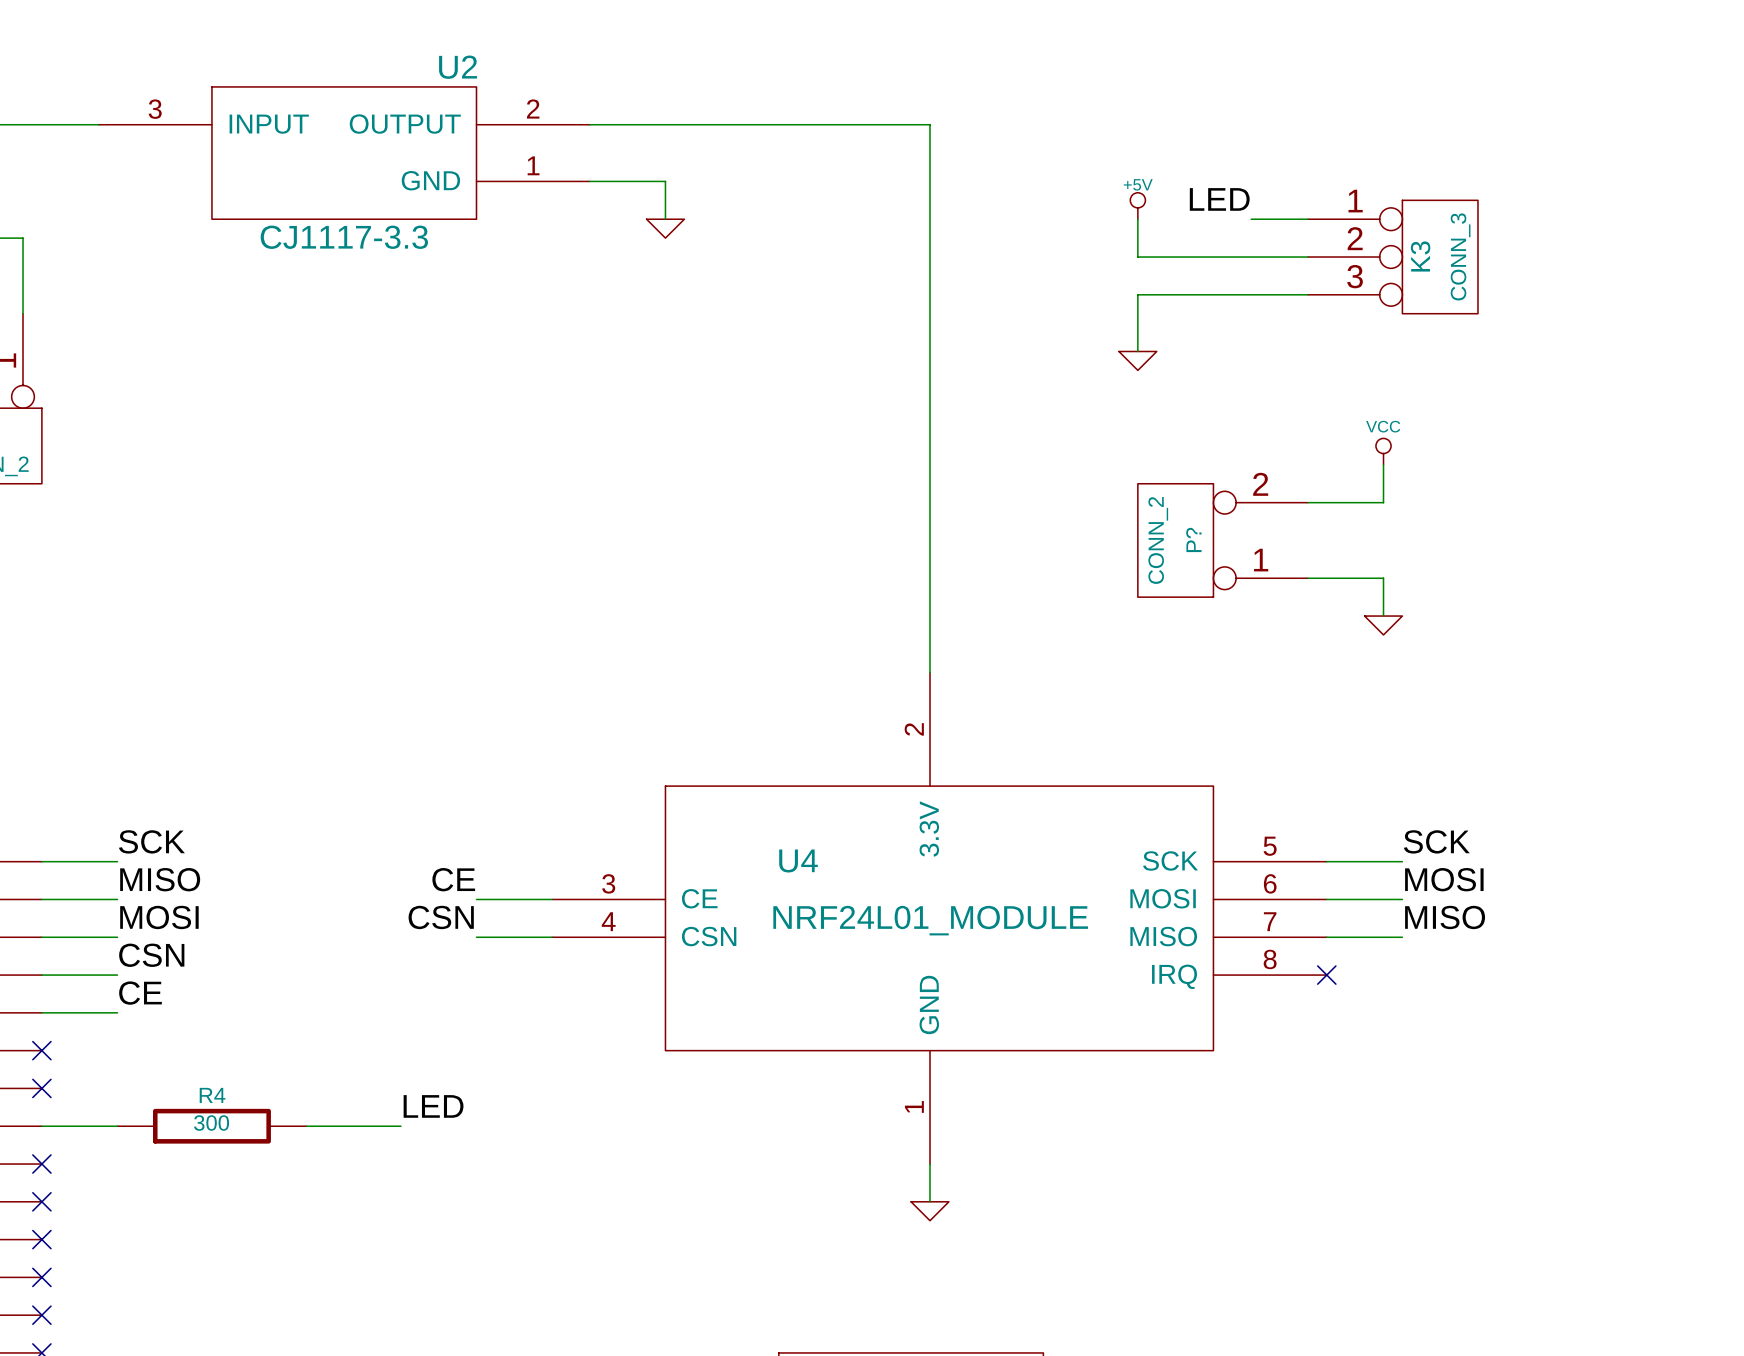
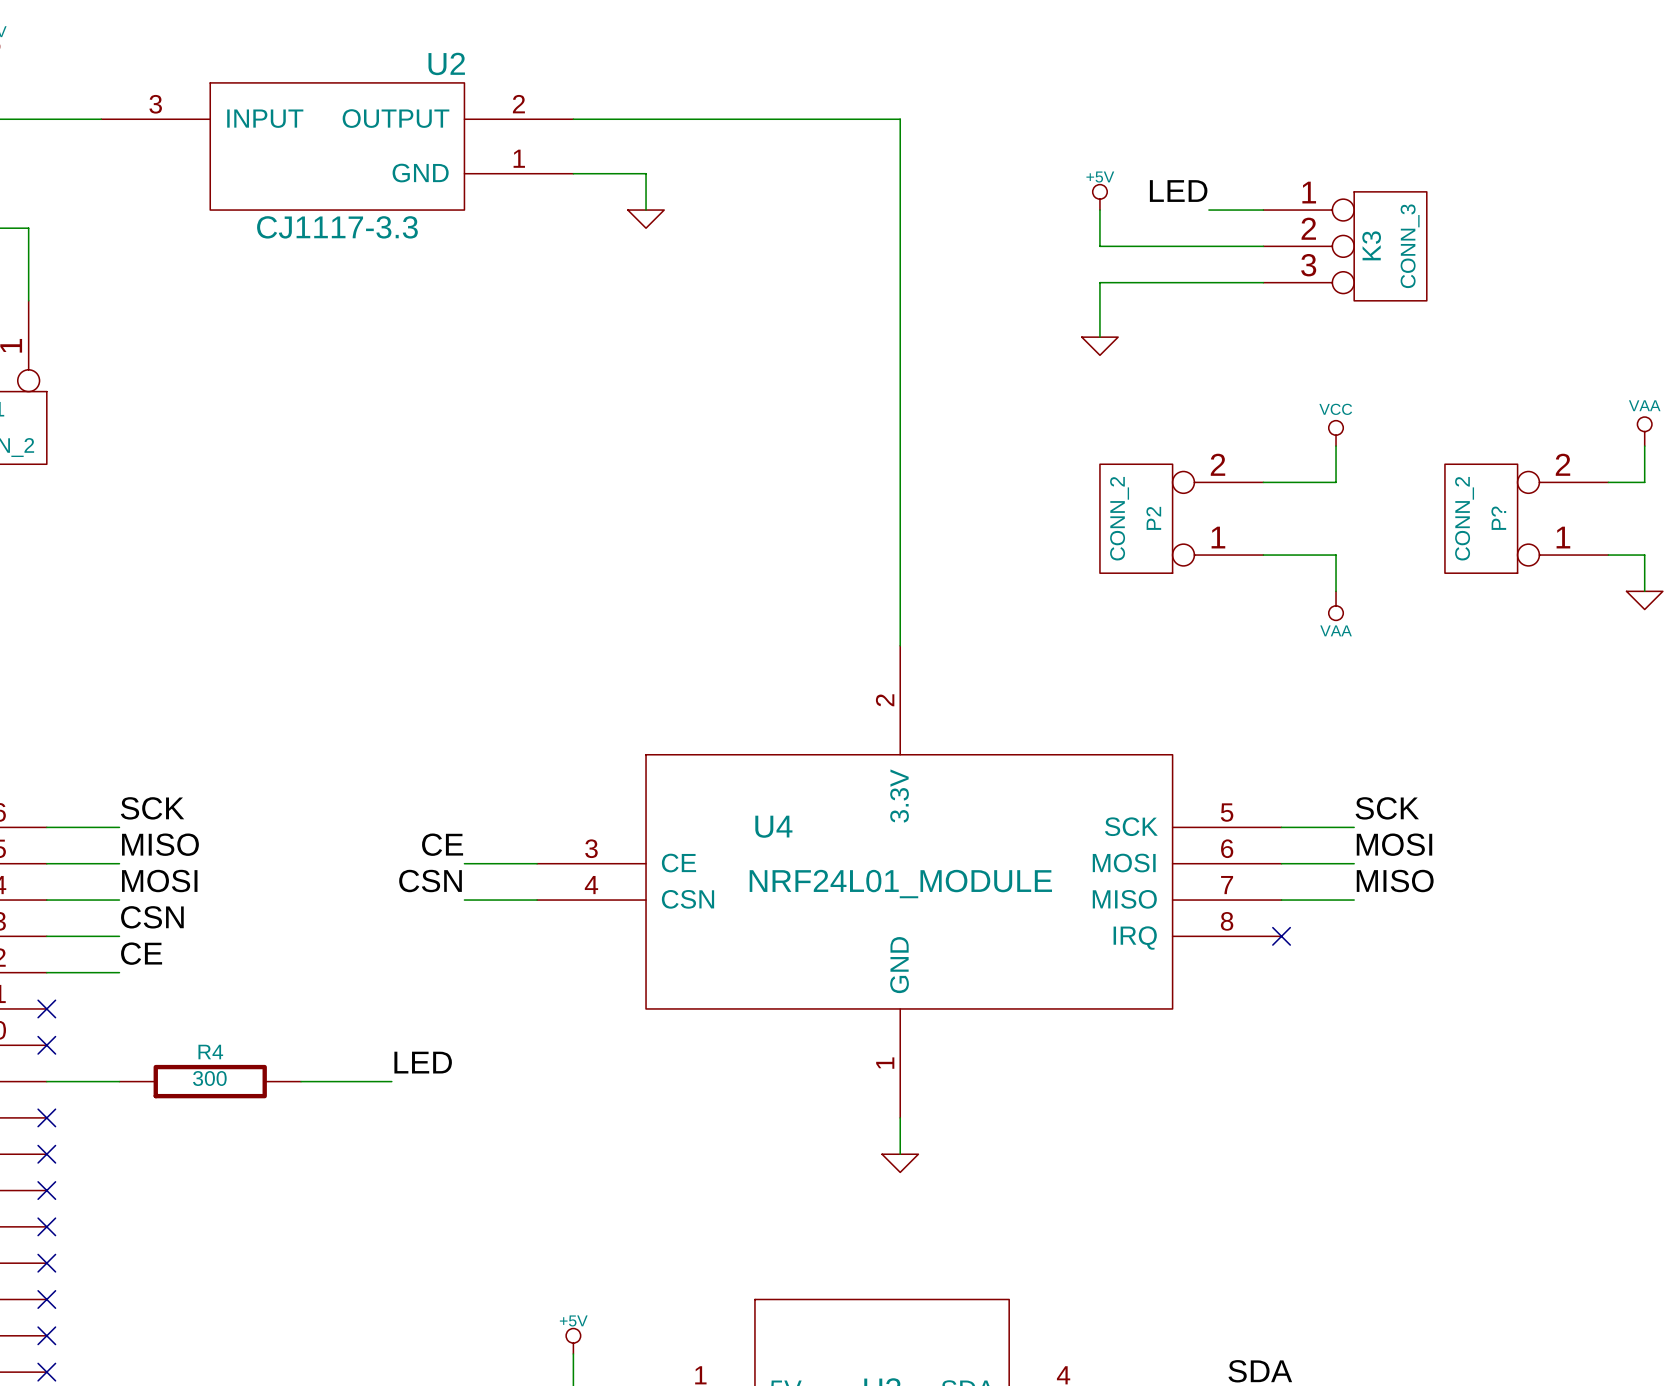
power symbol: none -> VAA (1644, 431)
wire: none -> (1644, 446) (1644, 482) (1608, 482)
P? name: P? (1193, 539) -> P2 (1153, 518)
P?: none -> CONN_2 (1526, 518)
wire: none -> (1608, 555) (1644, 555) (1644, 591)
power symbol shape: [1364, 616, 1403, 635] -> [1328, 591, 1344, 621]
power symbol: none -> (1644, 600)
power symbol text: none -> VAA (1336, 630)

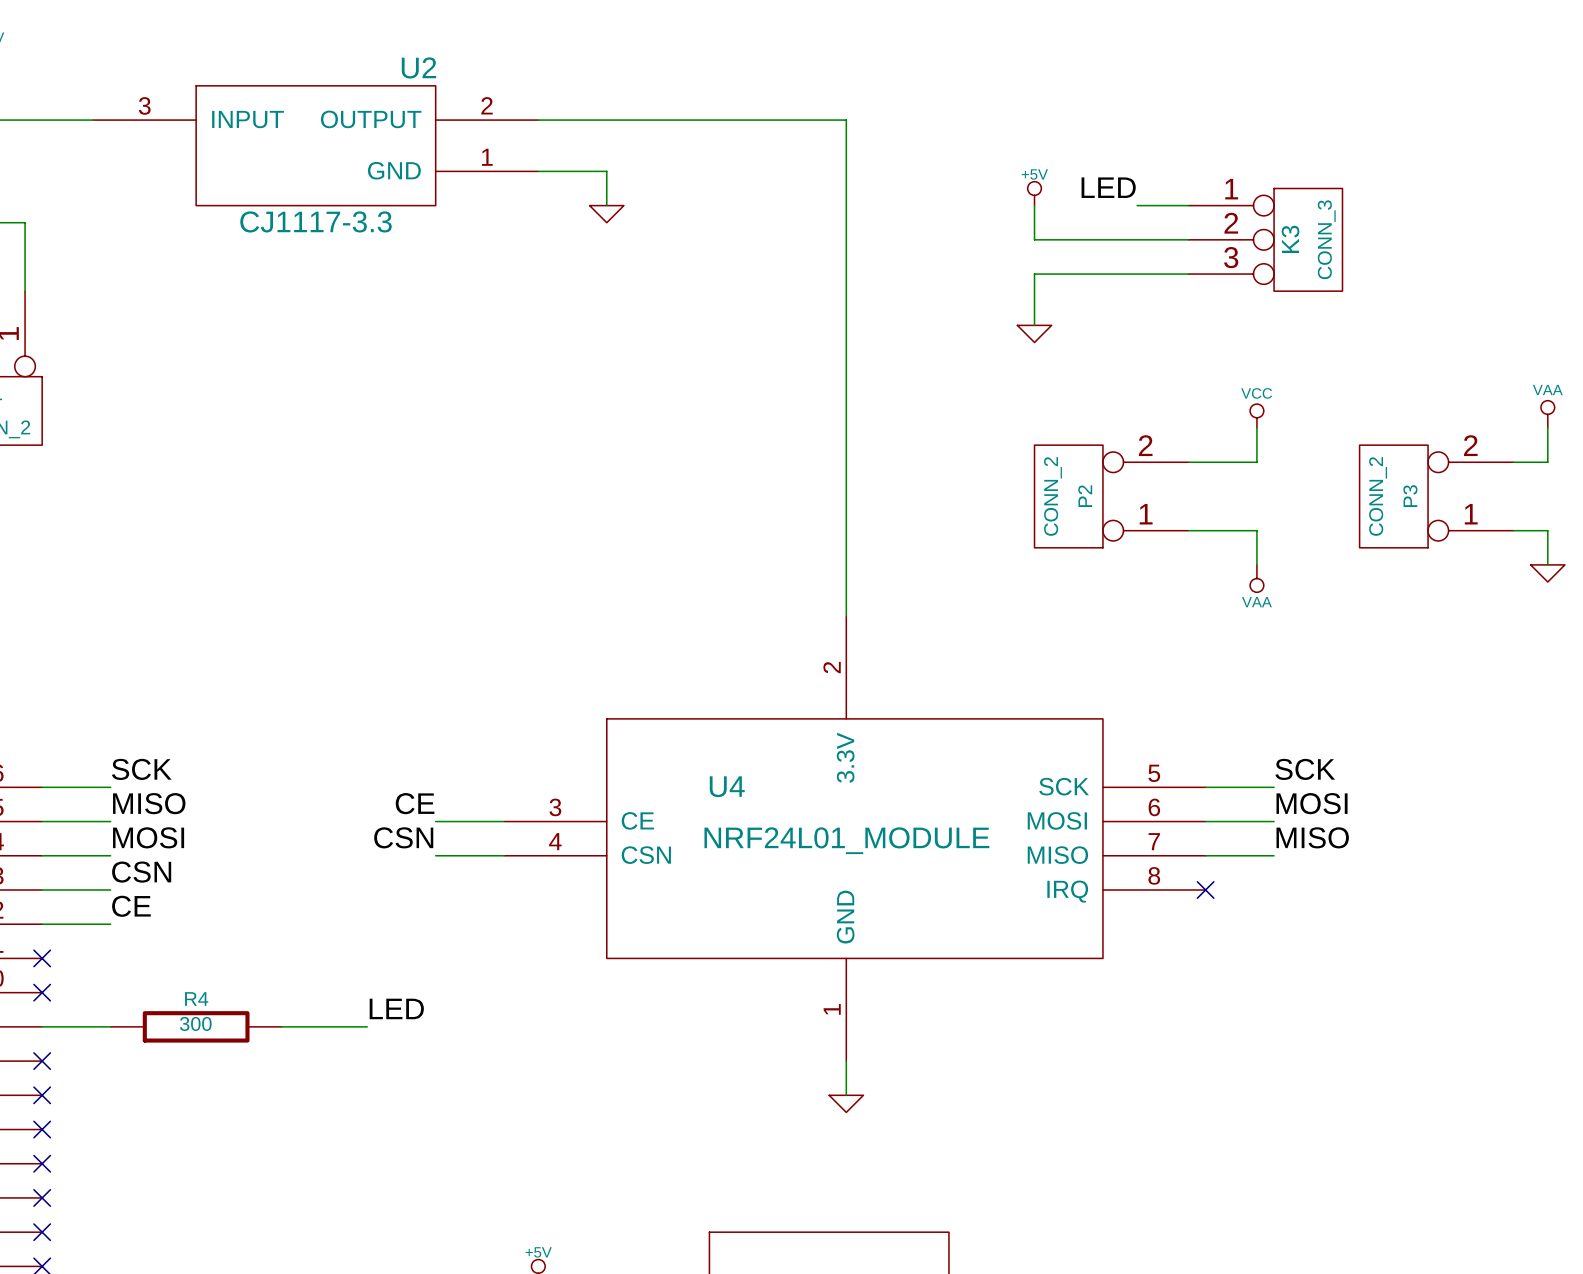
P? name: P? (1498, 518) -> P3 (1410, 496)

